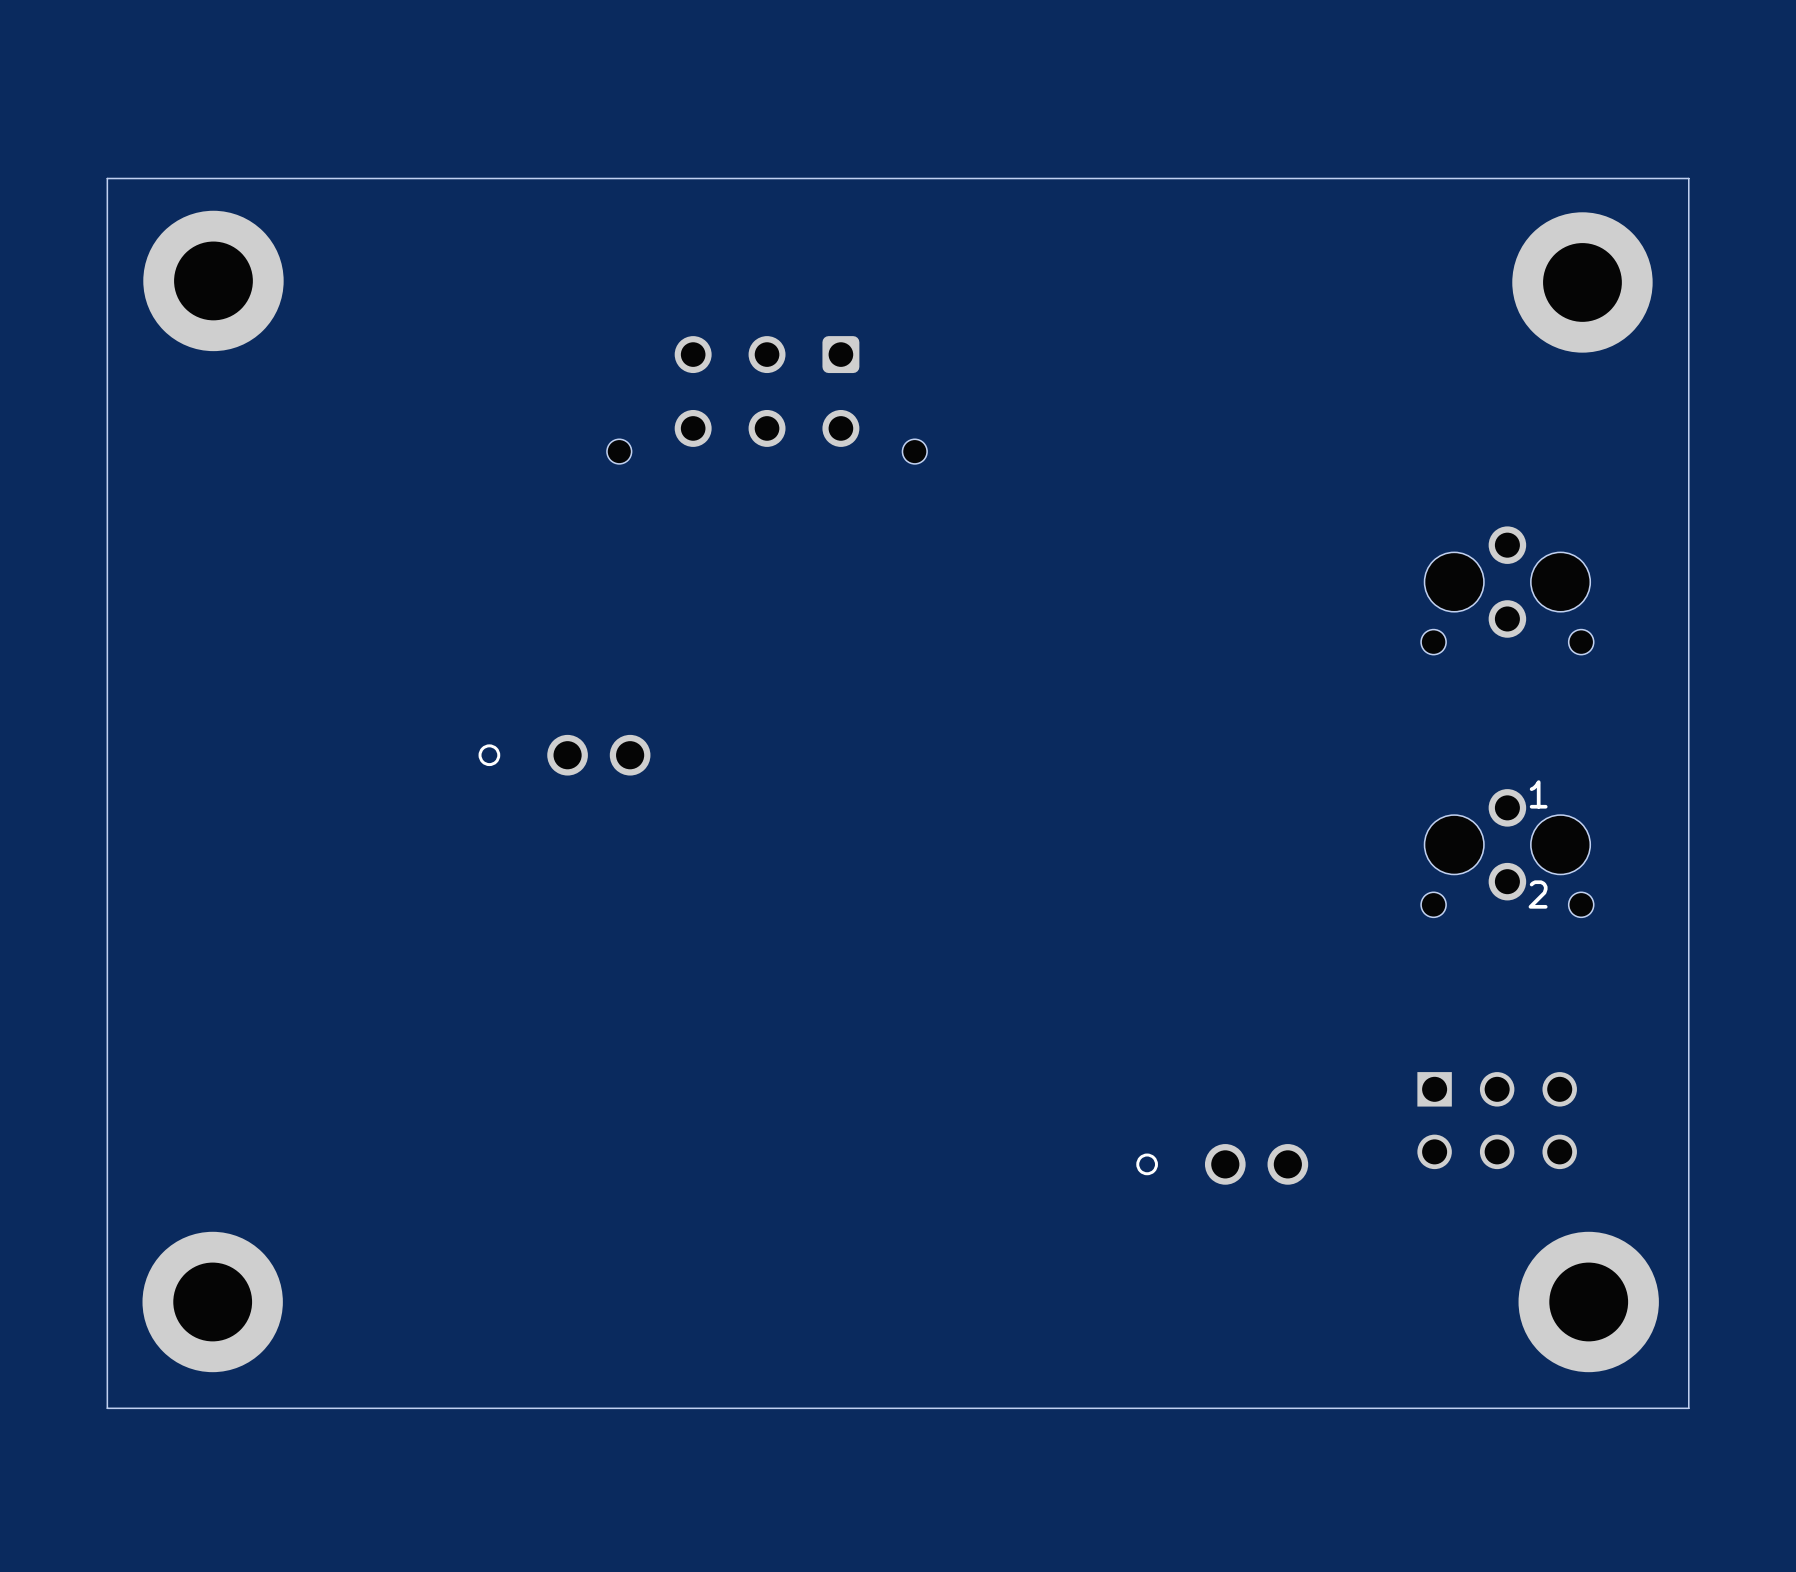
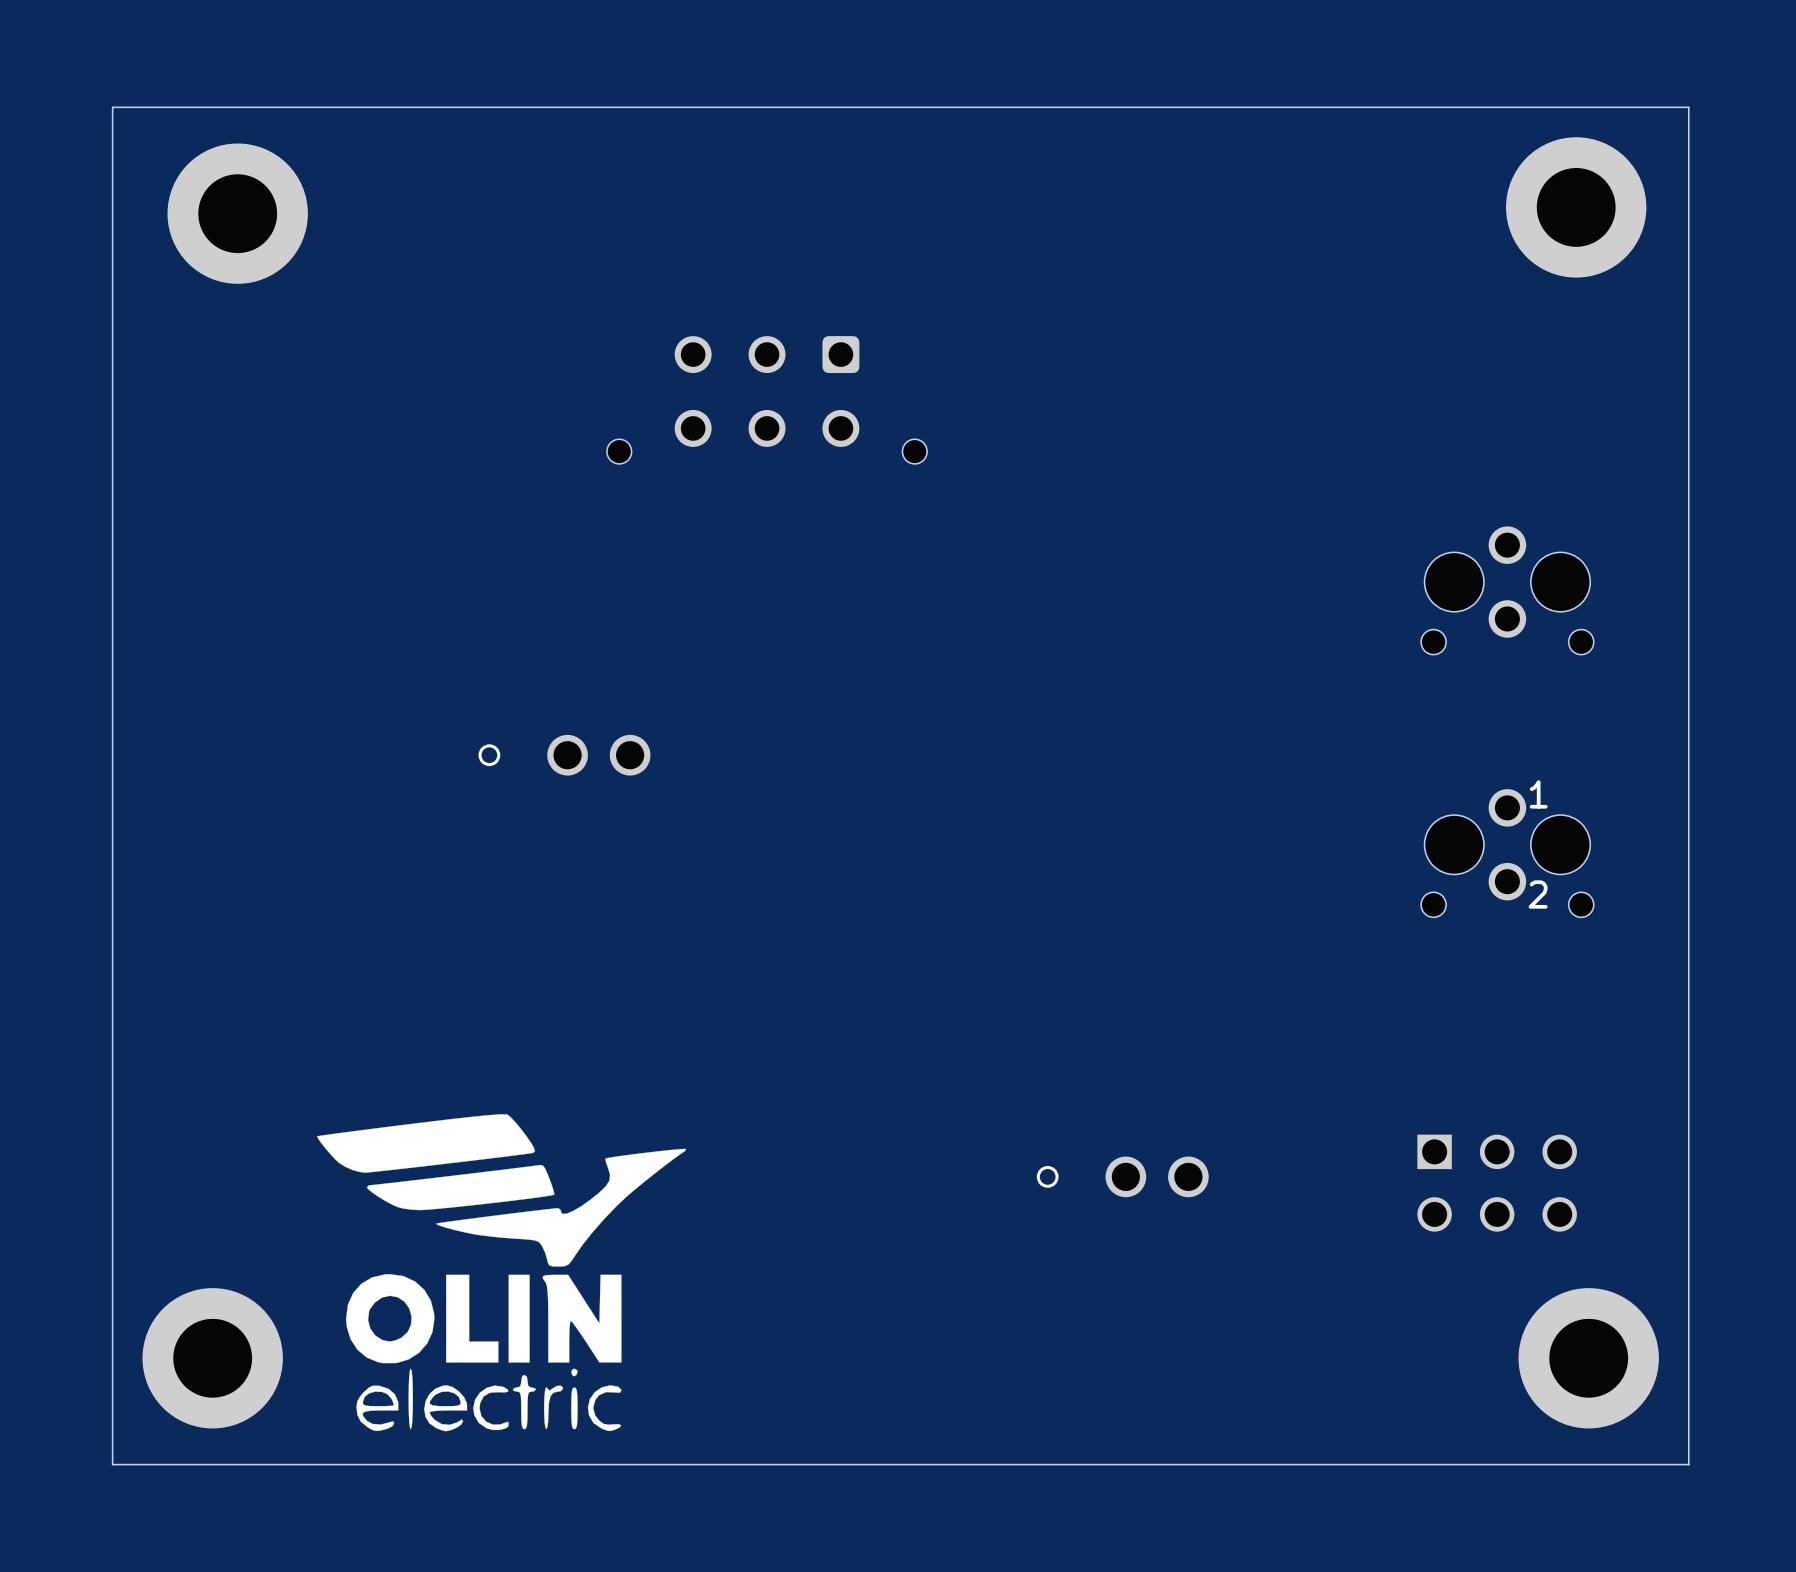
board edge: (1688, 178) (107, 178) (107, 1408) (1688, 1408) -> (1688, 178) (1688, 107) (112, 107) (112, 1464) (1688, 1464) (1688, 1408)
part position: (213, 280) -> (237, 213)
part position: (1582, 282) -> (1576, 207)
drawing: none -> [317, 1114, 687, 1432]
part position: (1497, 1120) -> (1497, 1183)
part position: (1222, 1164) -> (1122, 1176)
part position: (212, 1301) -> (212, 1358)
part position: (1588, 1301) -> (1588, 1358)

